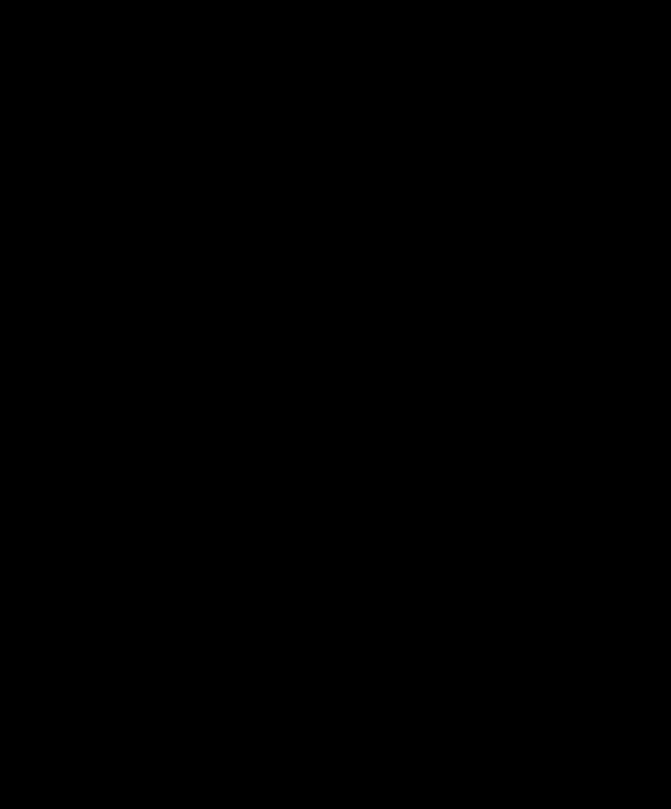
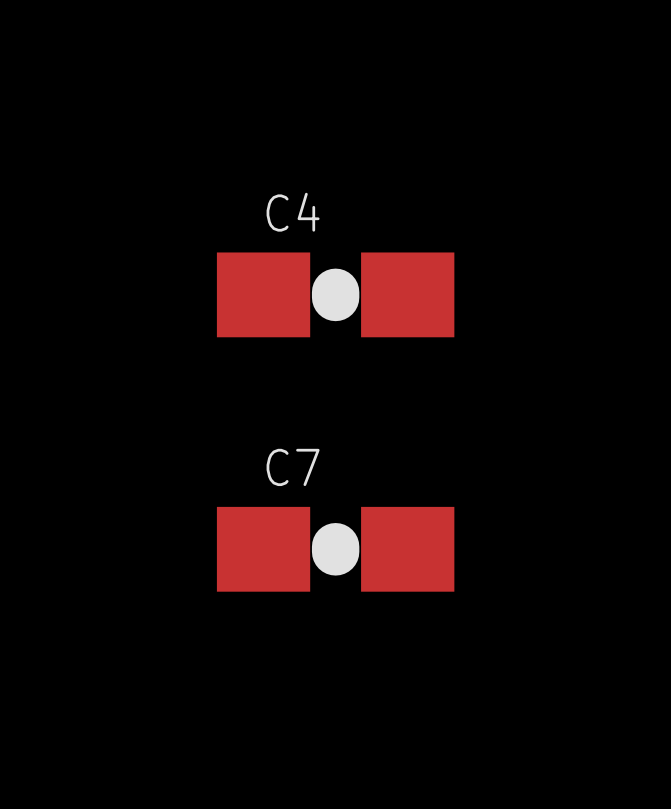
C4: none -> (335, 294)
C7: none -> (335, 549)

